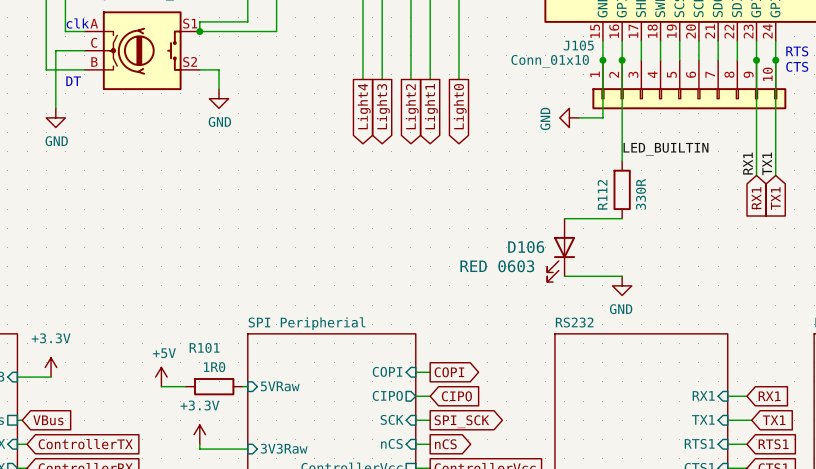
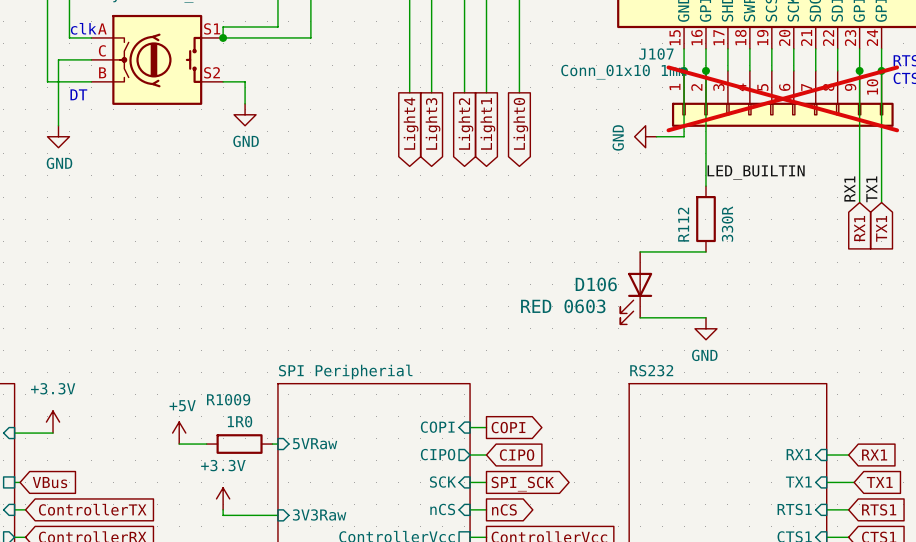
J105 name: J105 (578, 45) -> J107 (656, 54)
J105 value: Conn_01x10 (550, 61) -> Conn_01x10 1mm (623, 72)
J105 do-not-place cross: none -> (782, 98)
R101 name: R101 (204, 347) -> R1009 (228, 399)

